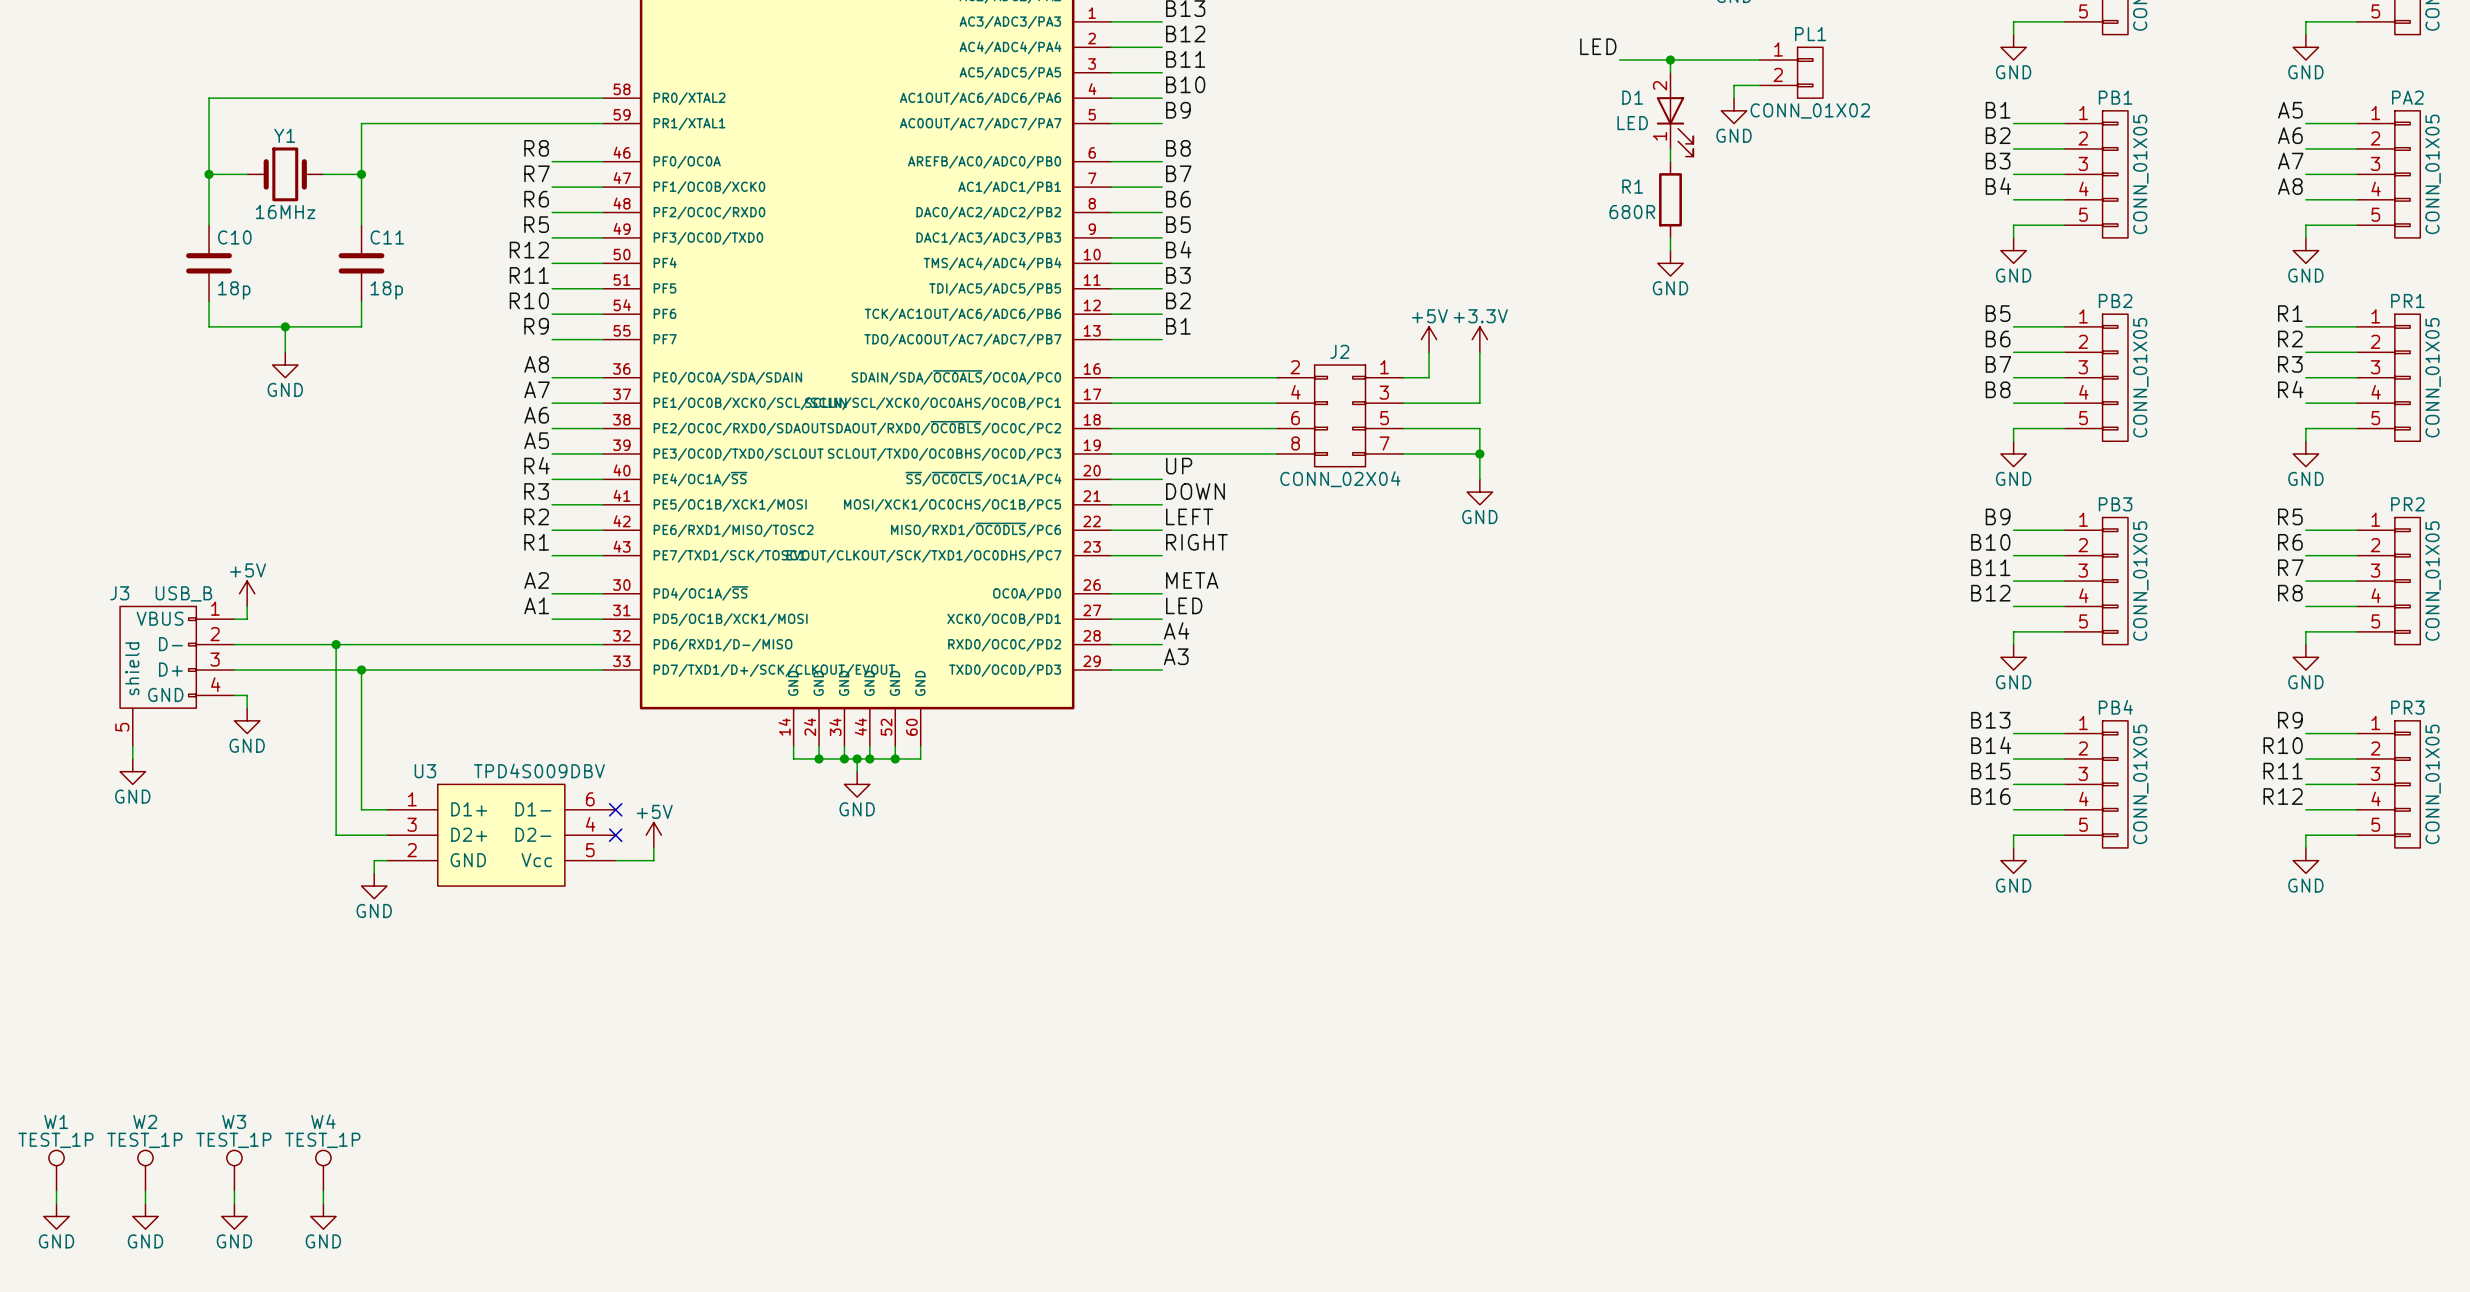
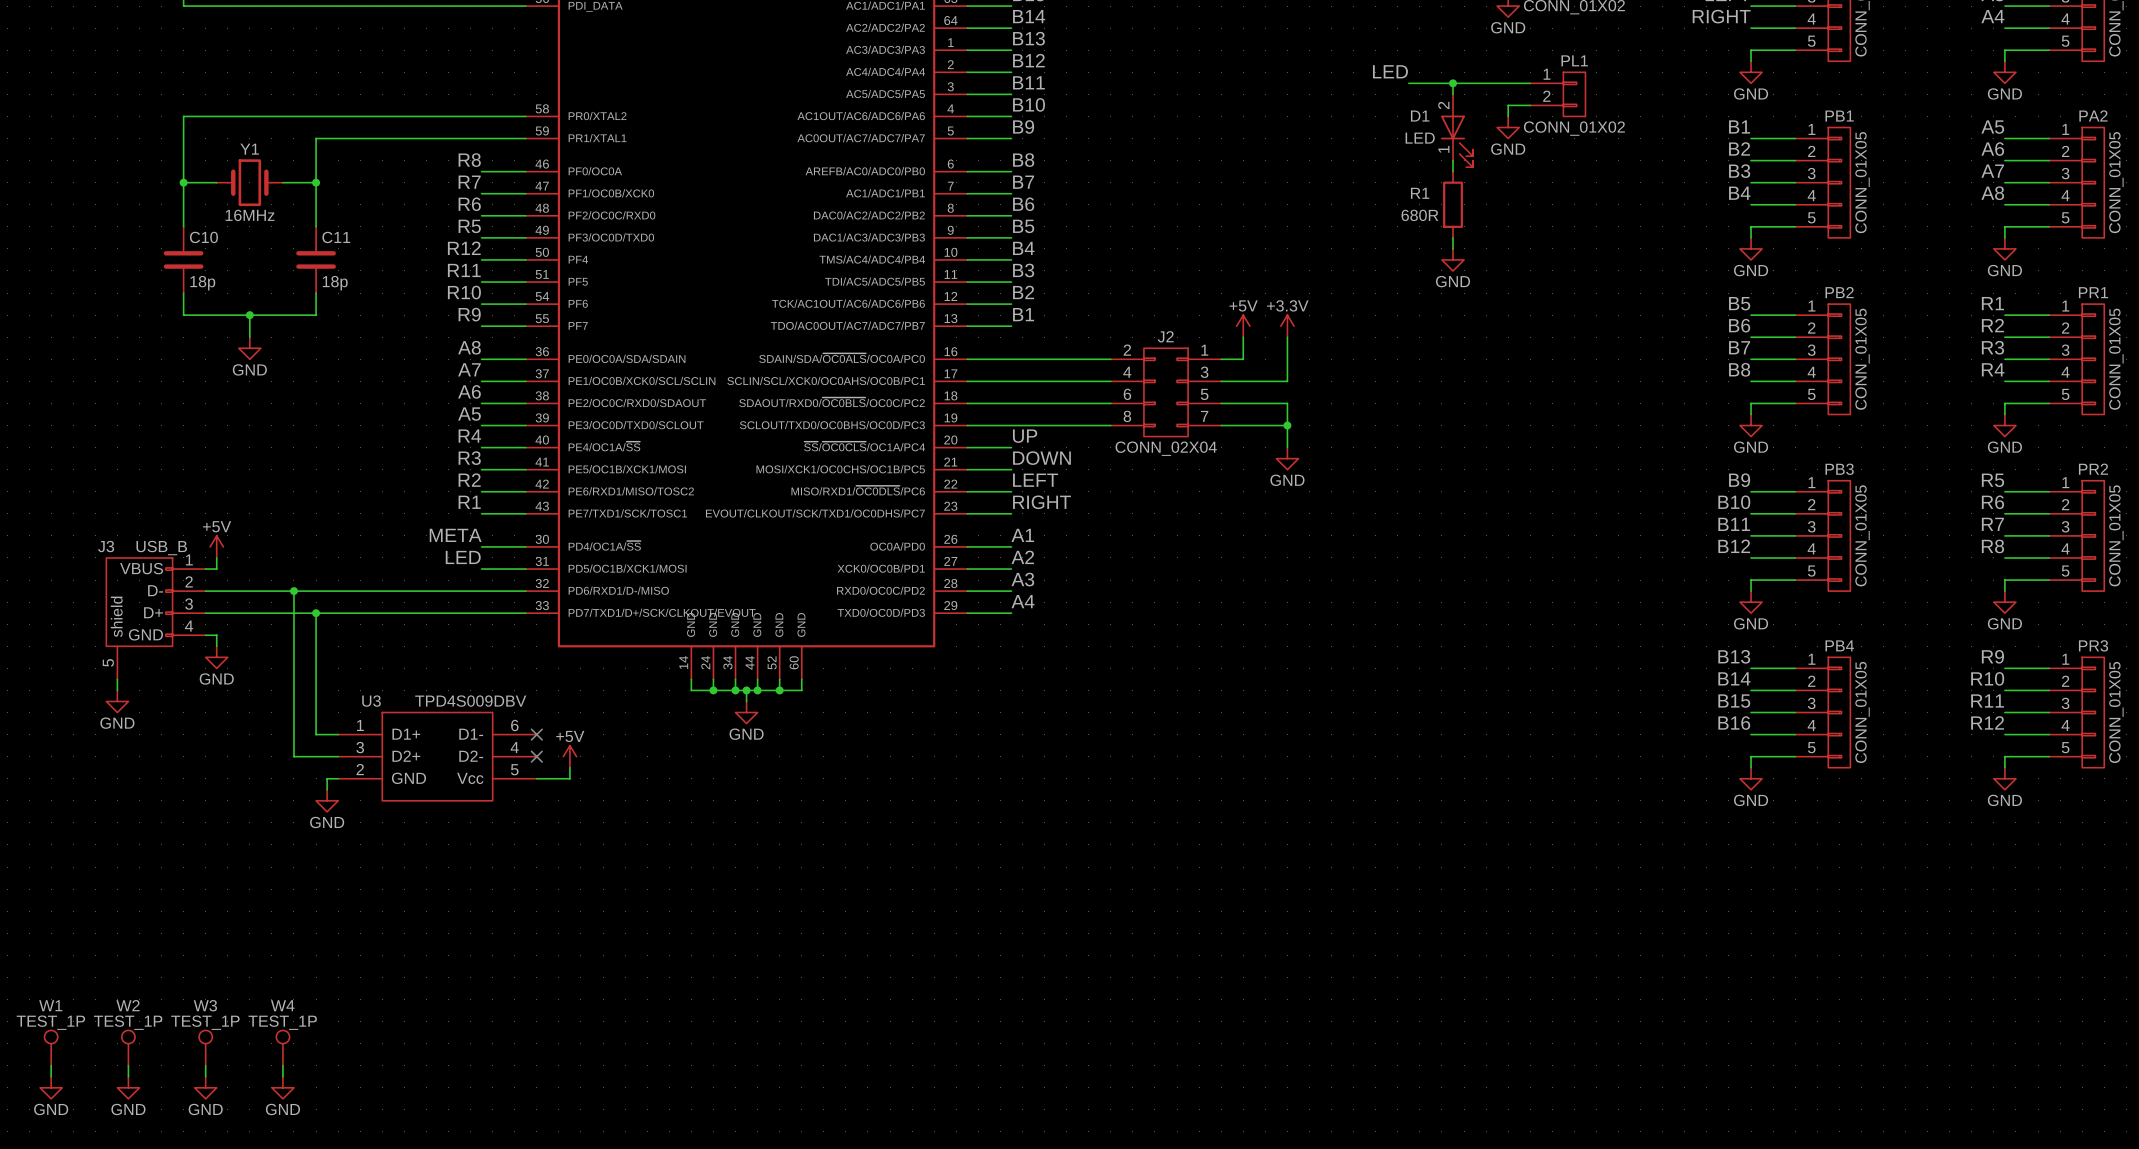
label: A2 (536, 580) -> META (455, 535)
label: META (1192, 580) -> A1 (1022, 535)
label: A1 (536, 605) -> LED (463, 557)
label: LED (1184, 605) -> A2 (1022, 557)
label: A4 (1176, 630) -> A3 (1022, 579)
label: A3 (1176, 656) -> A4 (1022, 601)

